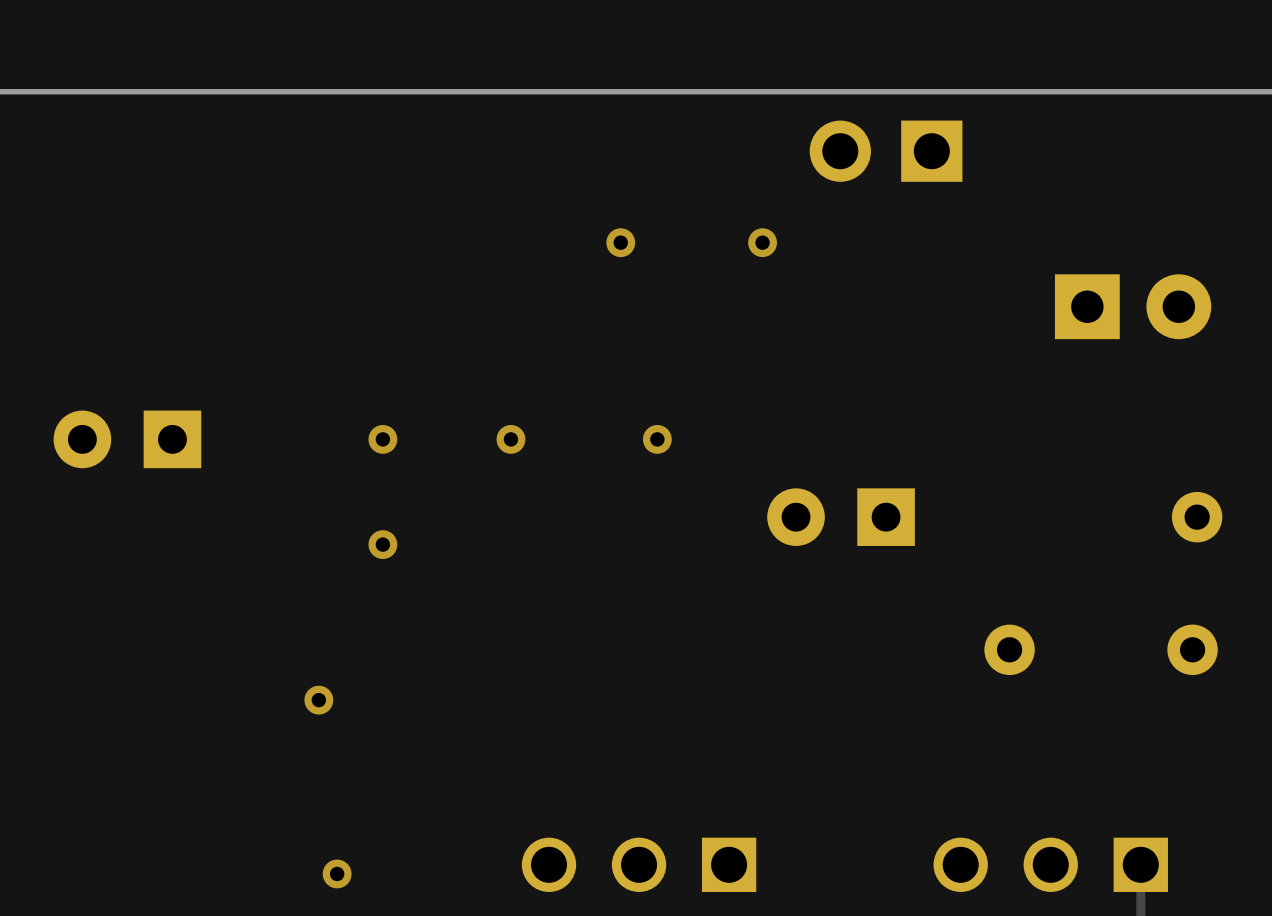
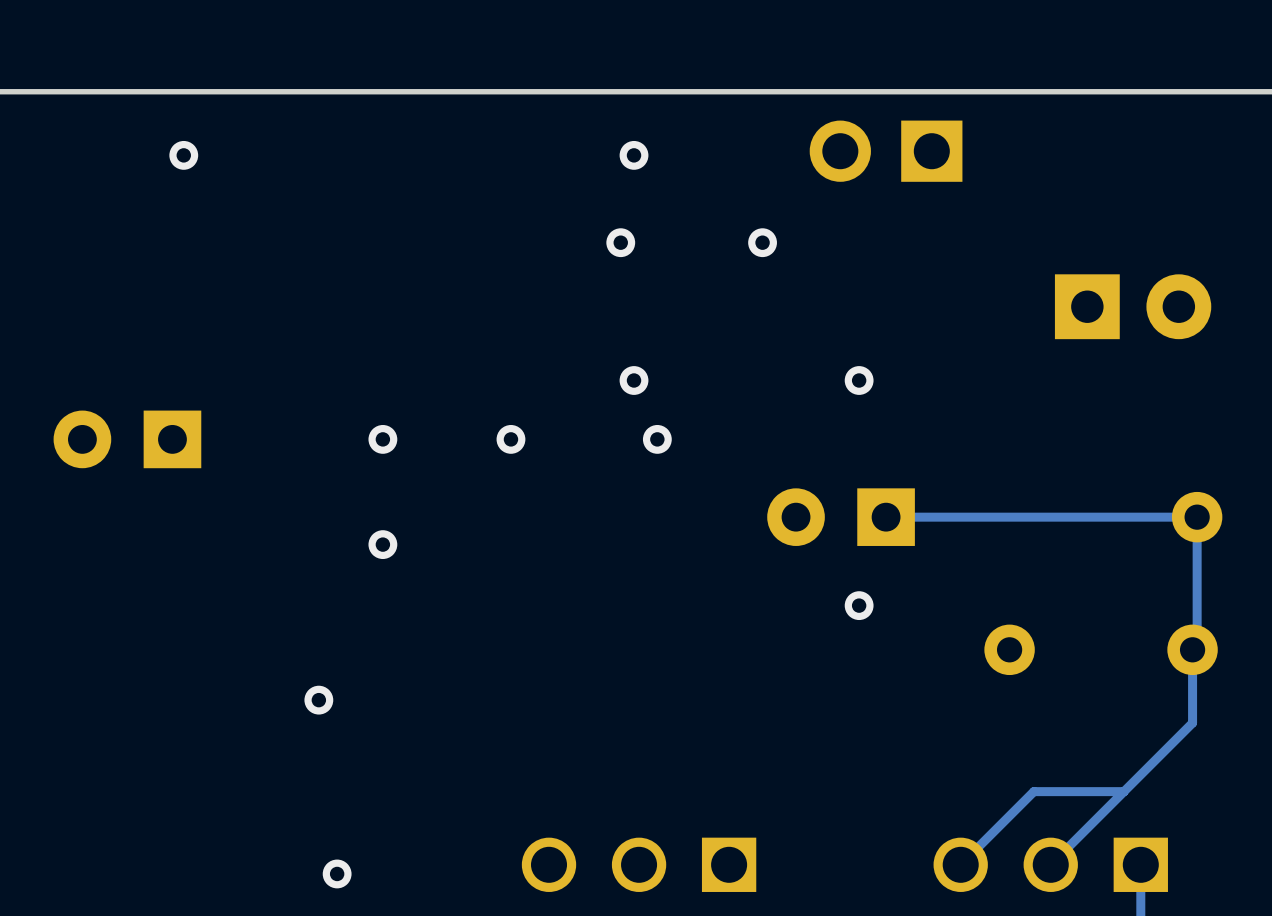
via: none -> (183, 155)
via: none -> (634, 155)
via: none -> (634, 380)
via: none -> (859, 380)
track: none -> (886, 517) (1197, 517) (1197, 645)
via: none -> (859, 605)
track: none -> (1192, 649) (1192, 723) (1050, 864)
track: none -> (1123, 791) (1033, 791) (960, 864)

